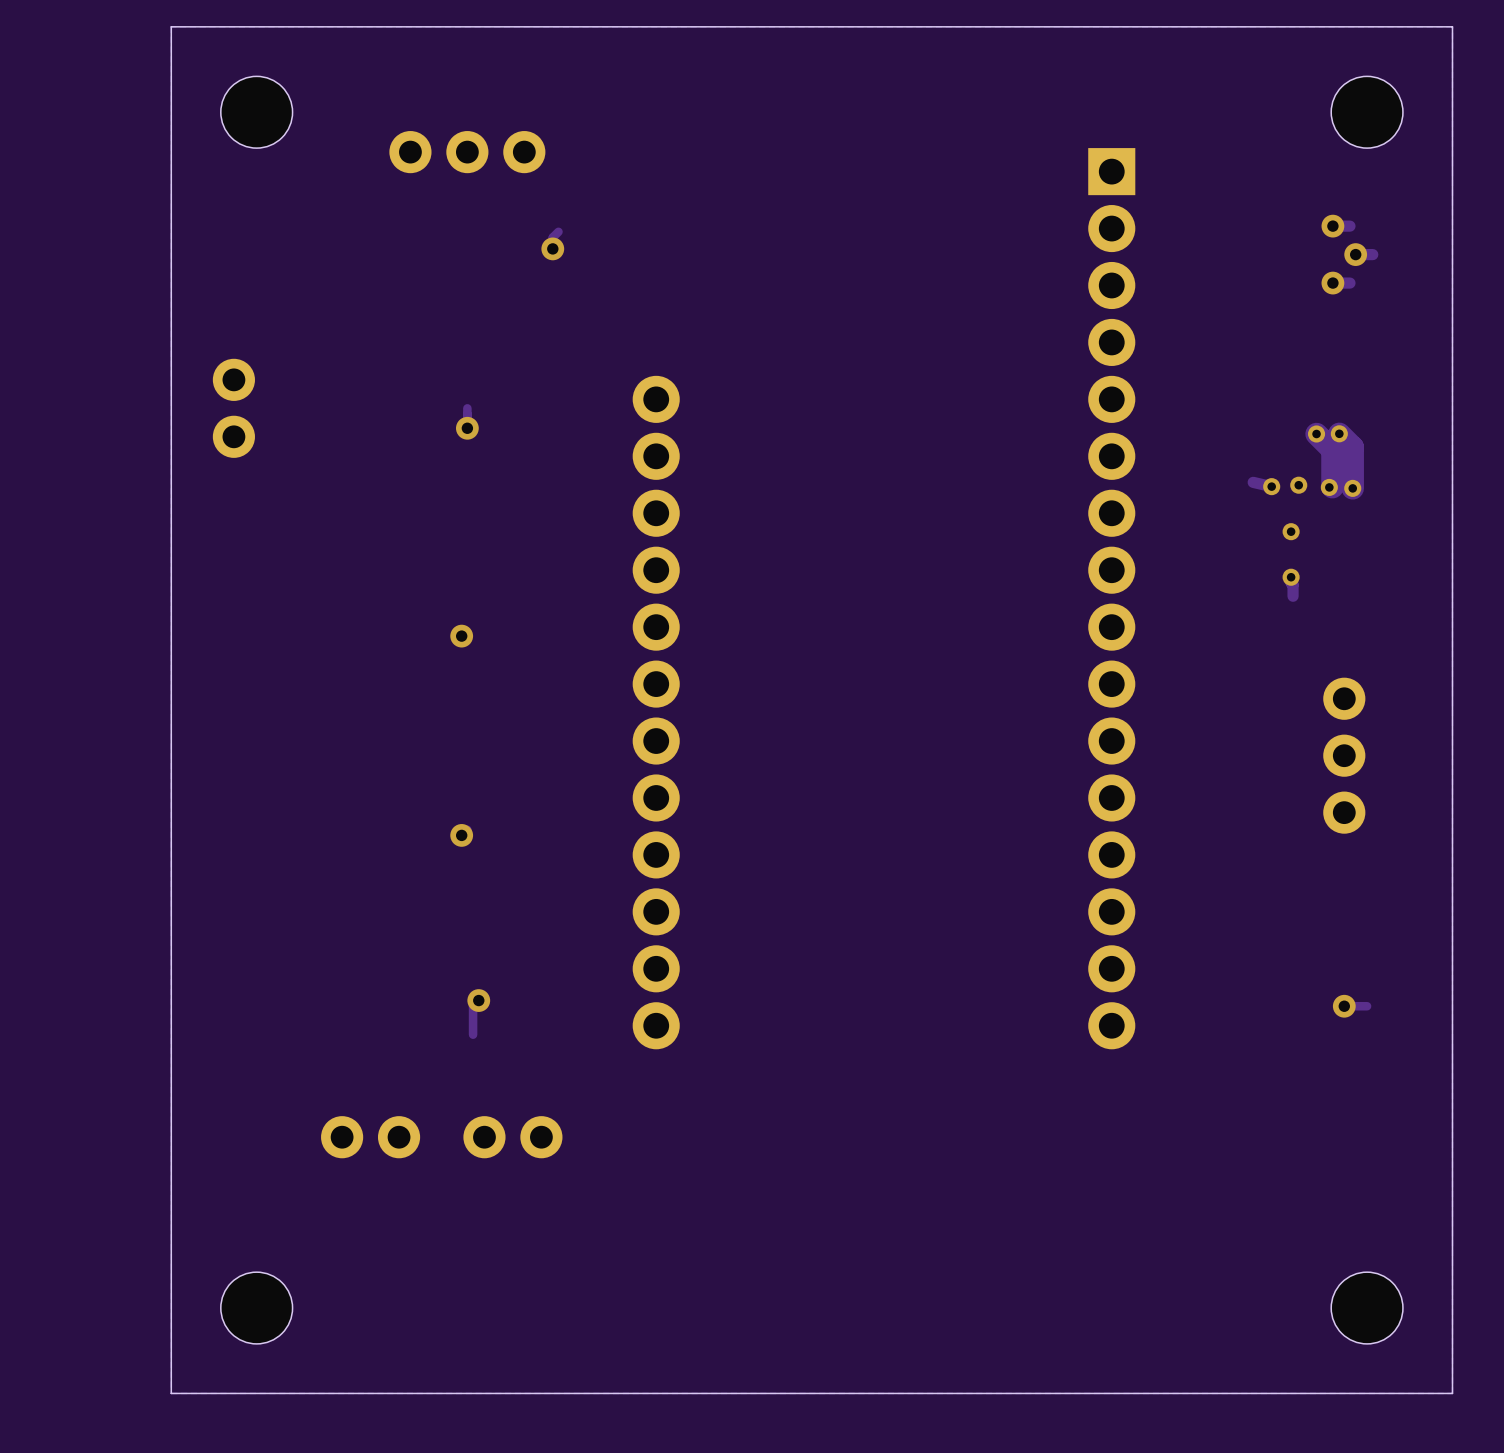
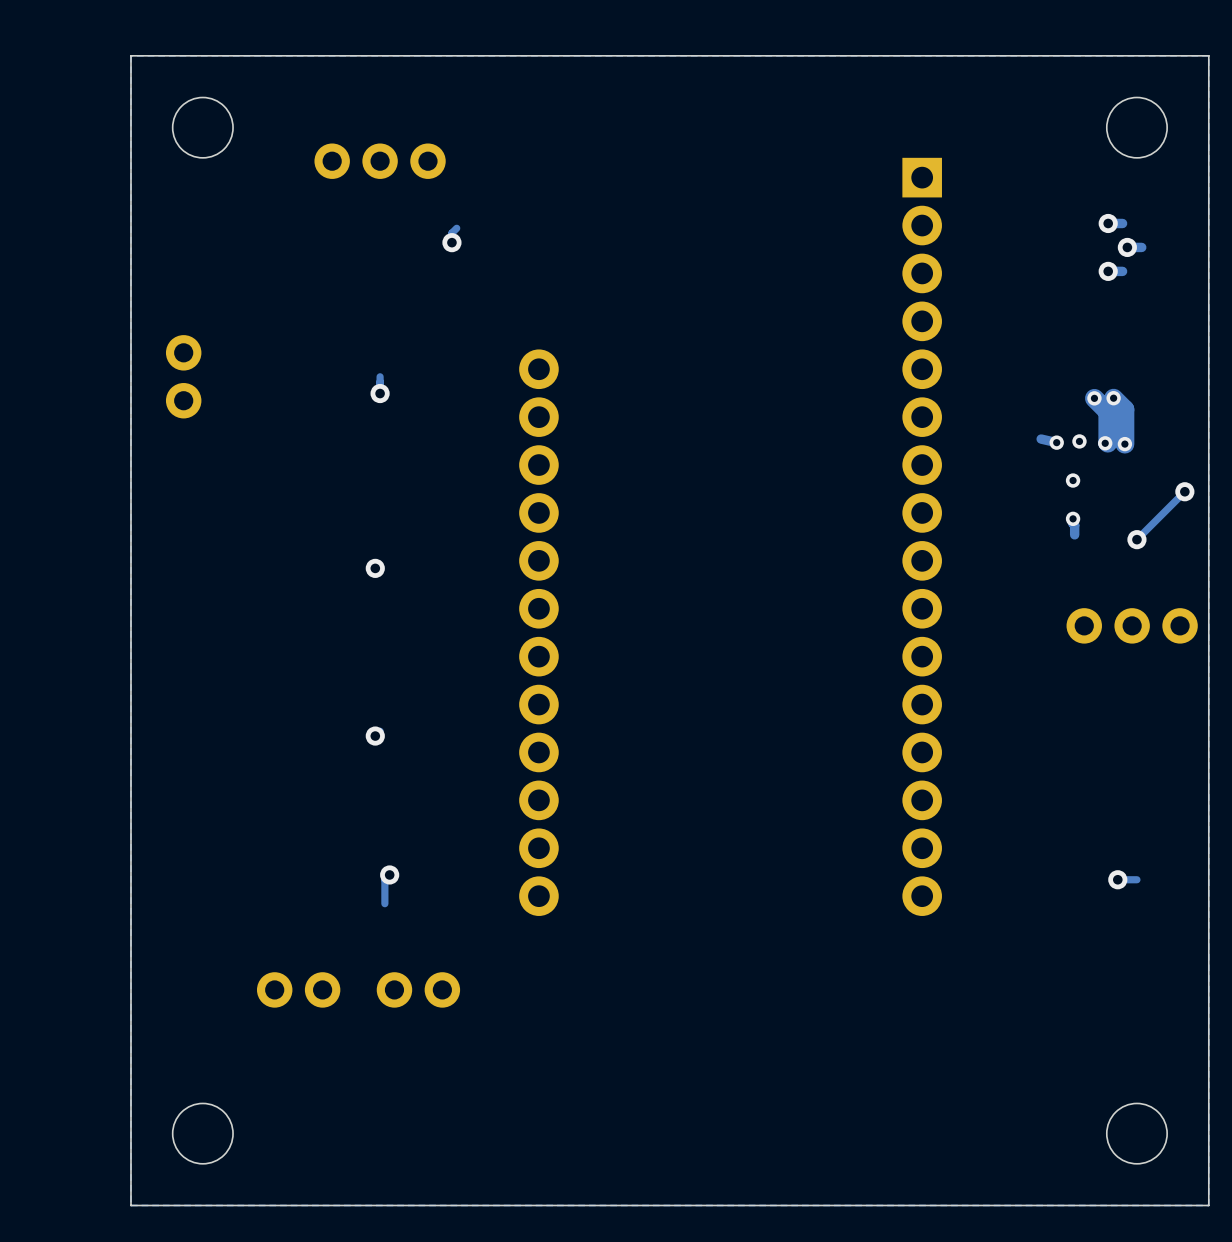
track: none -> (1184, 491) (1136, 539)
via: none -> (1184, 491)
via: none -> (1136, 539)
part rotation: 0° (1344, 755) -> 90° clockwise (1132, 625)

